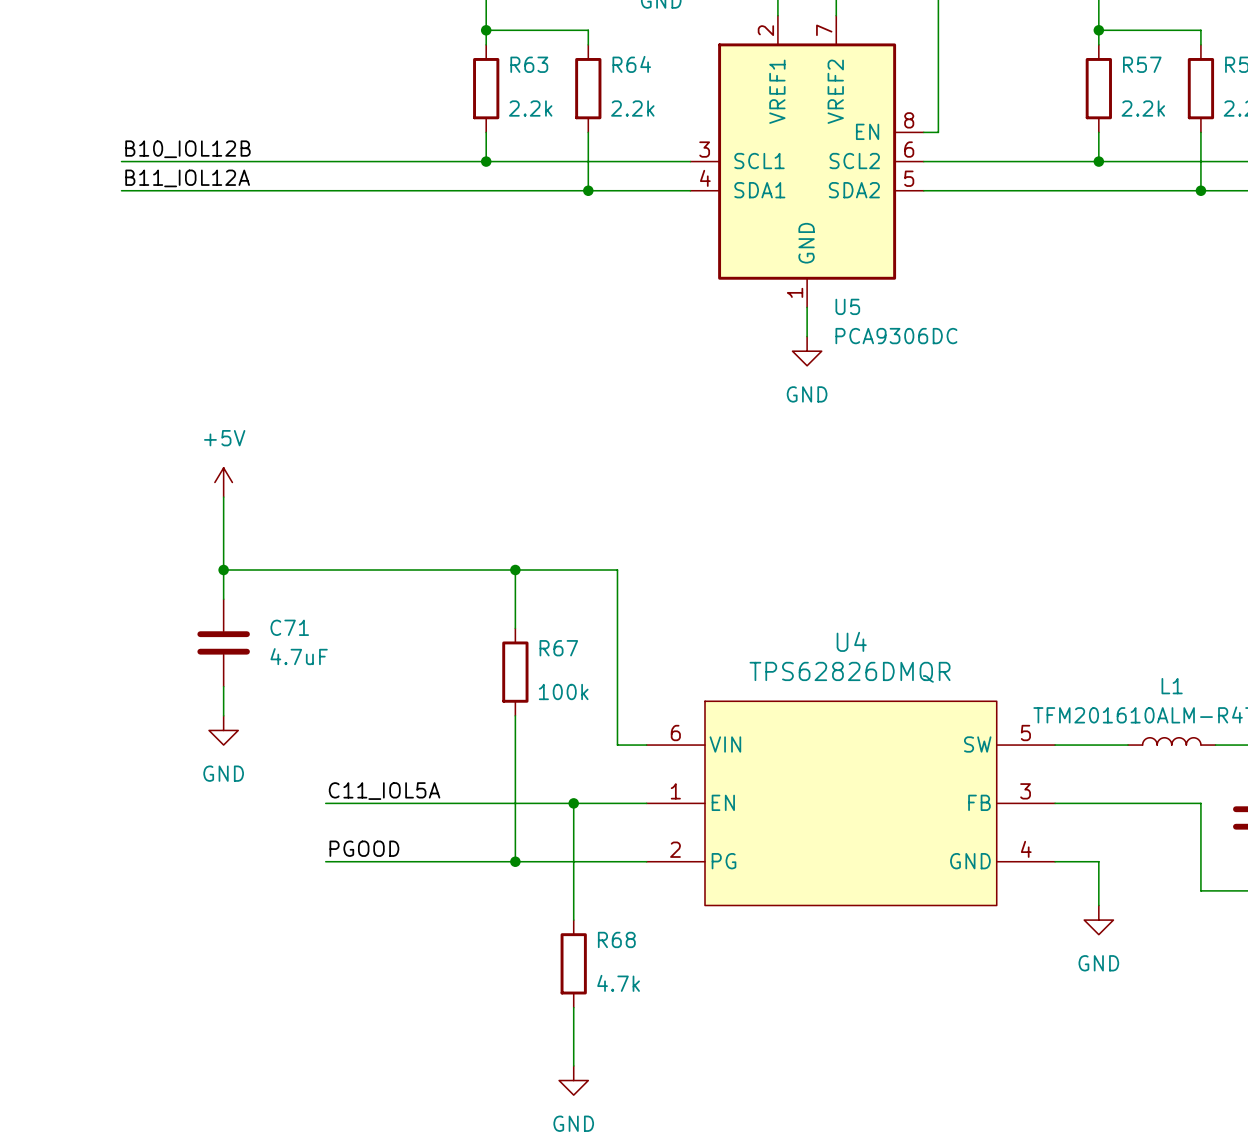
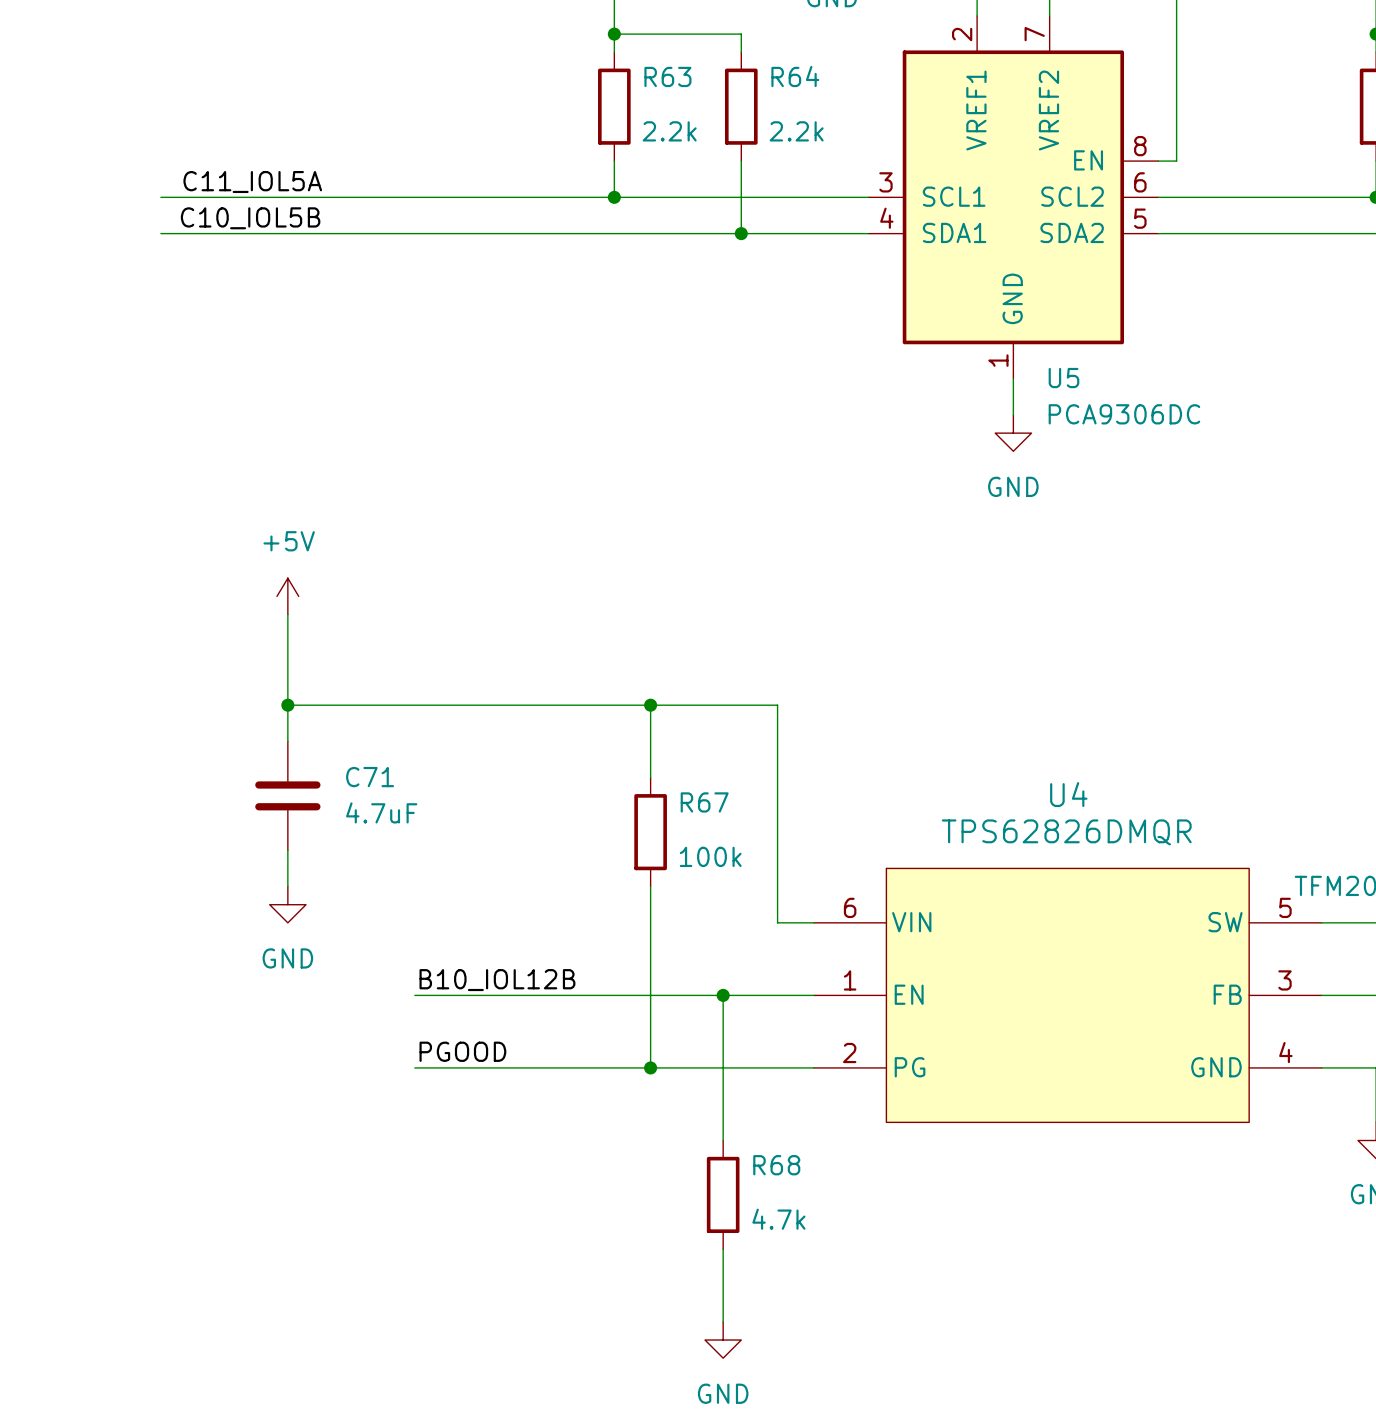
label: B10_IOL12B (187, 149) -> C10_IOL5B (250, 218)
label: B11_IOL12A (187, 178) -> C11_IOL5A (252, 182)
label: C11_IOL5A (384, 791) -> B10_IOL12B (497, 980)

